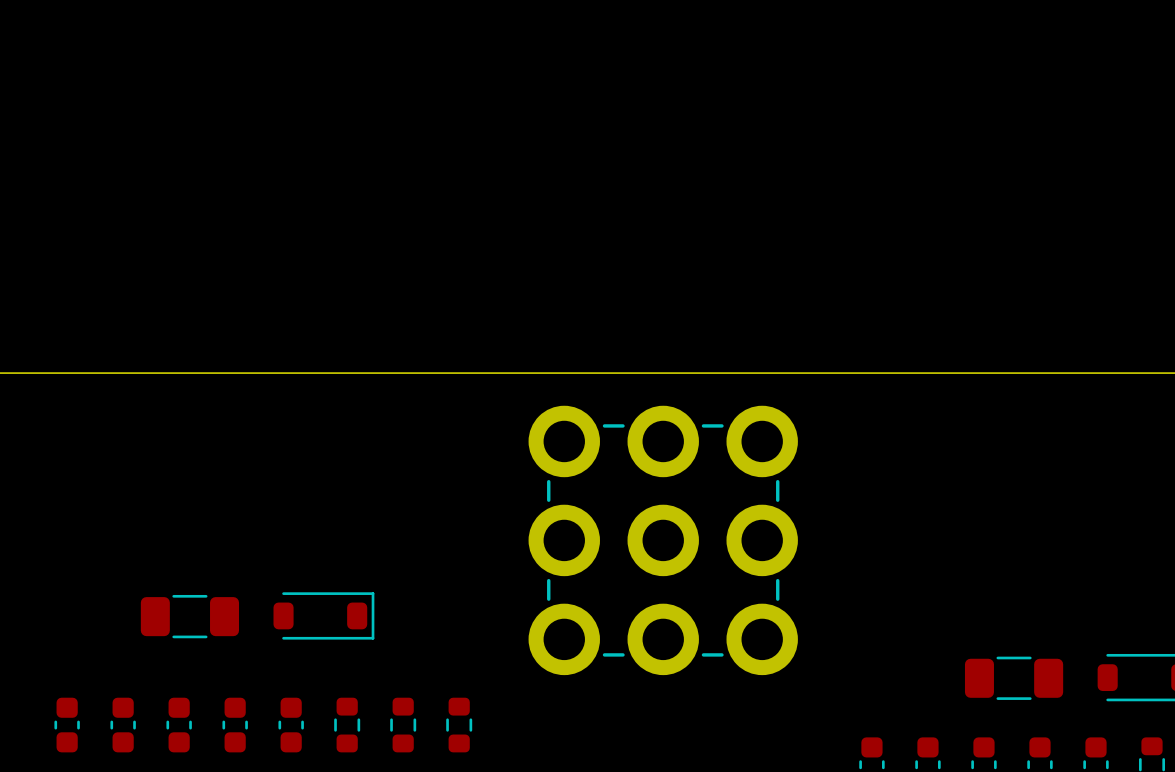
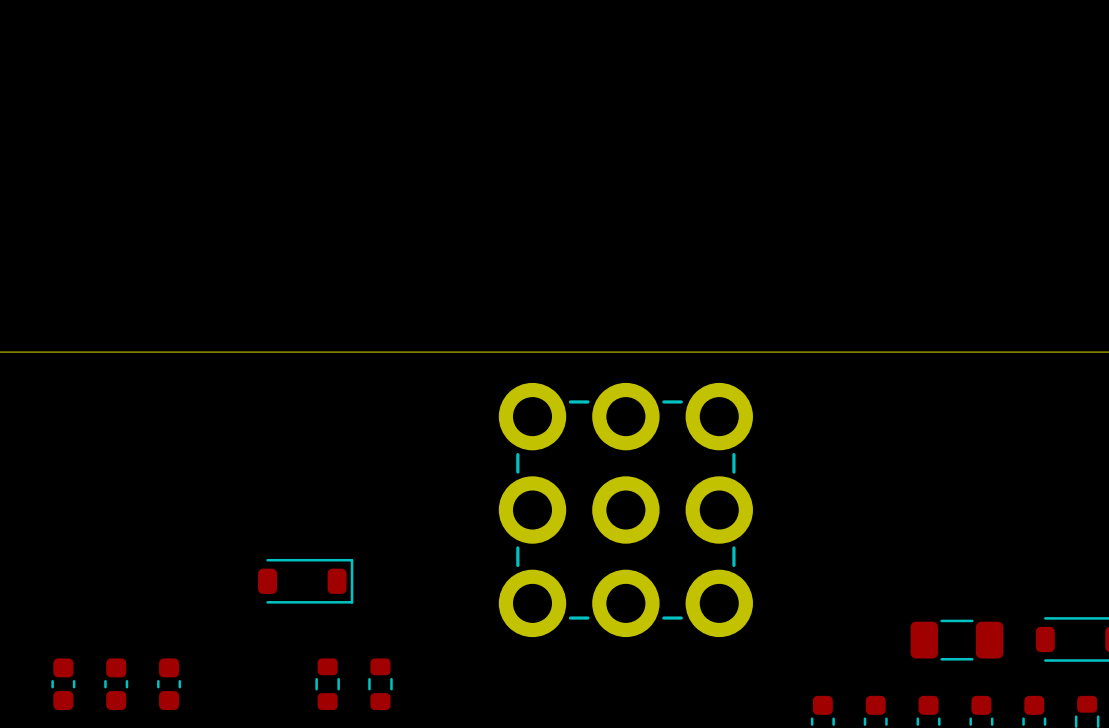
part: (189, 616) -> none
part: (235, 725) -> none
part: (291, 725) -> none
part: (459, 725) -> none

